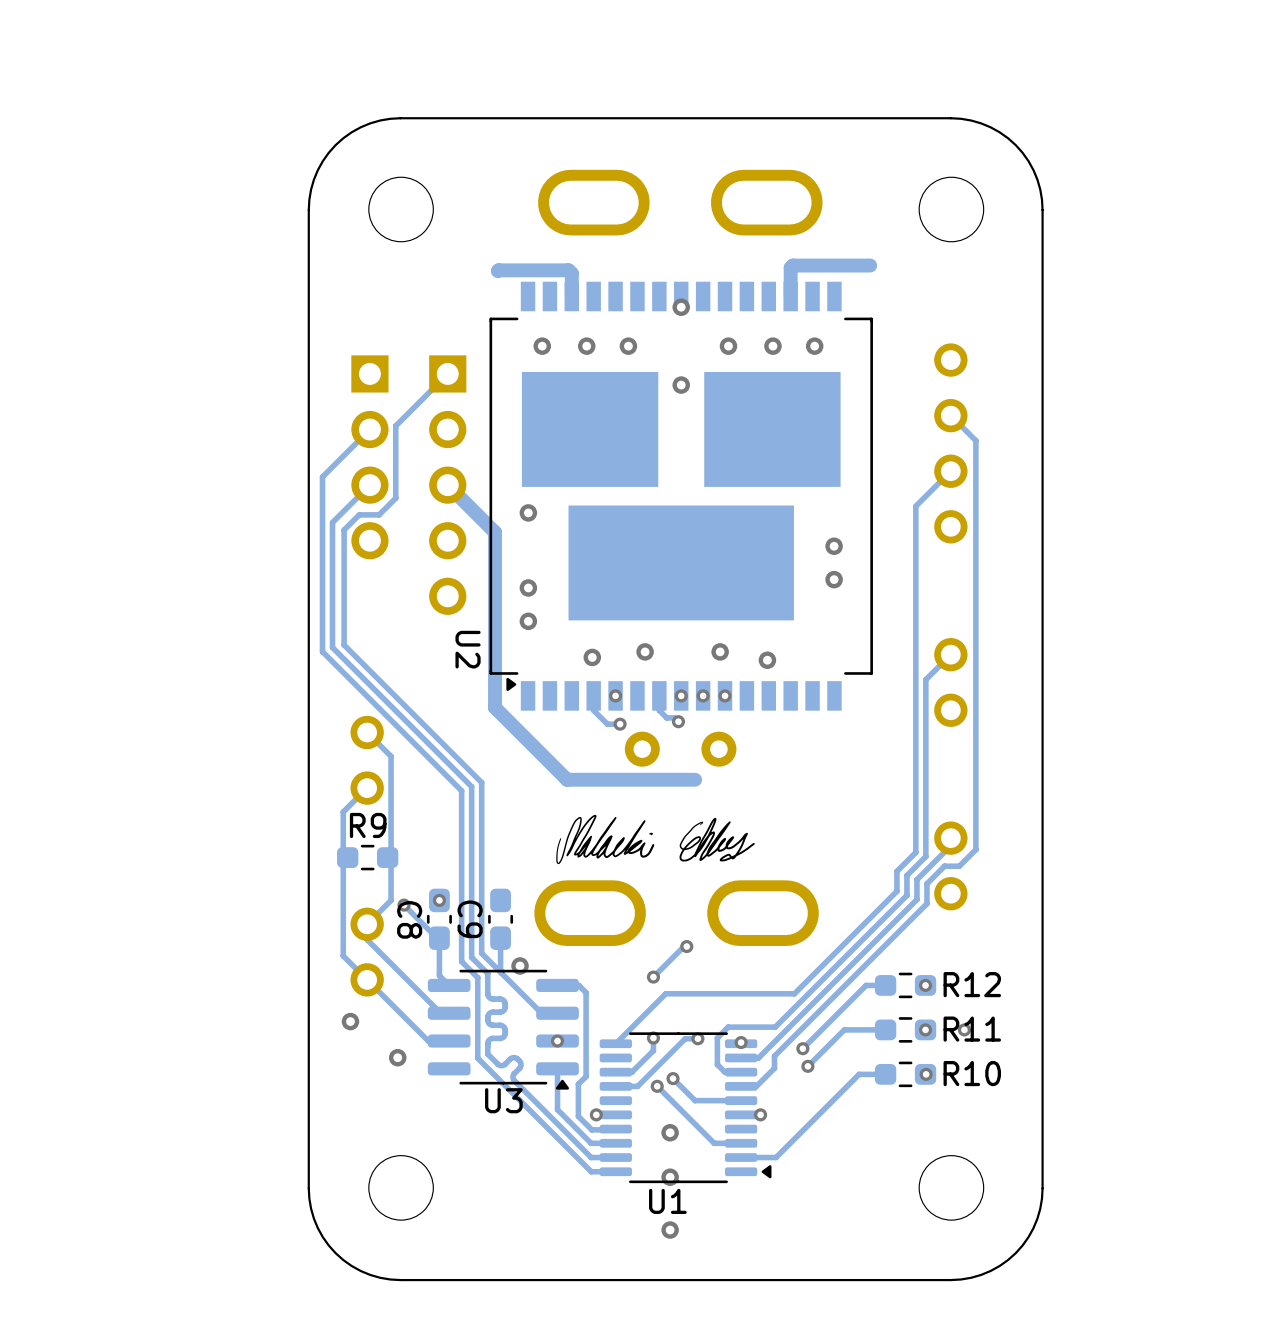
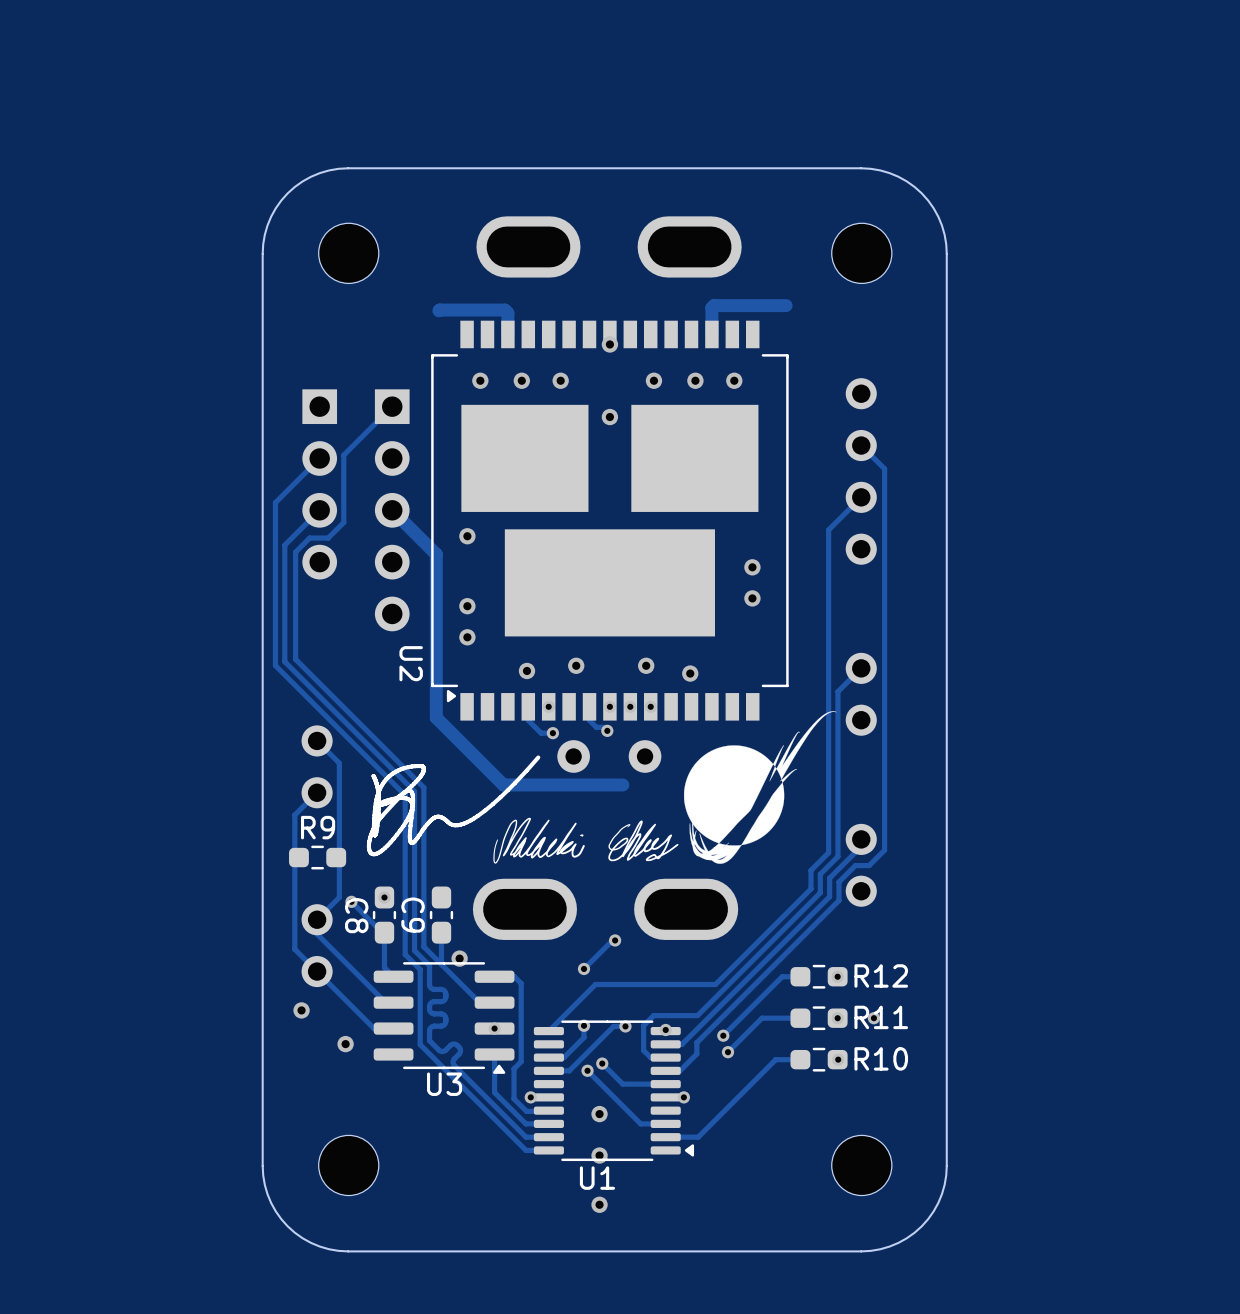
drawing: none -> [684, 711, 837, 864]
drawing: none -> [366, 755, 541, 857]

